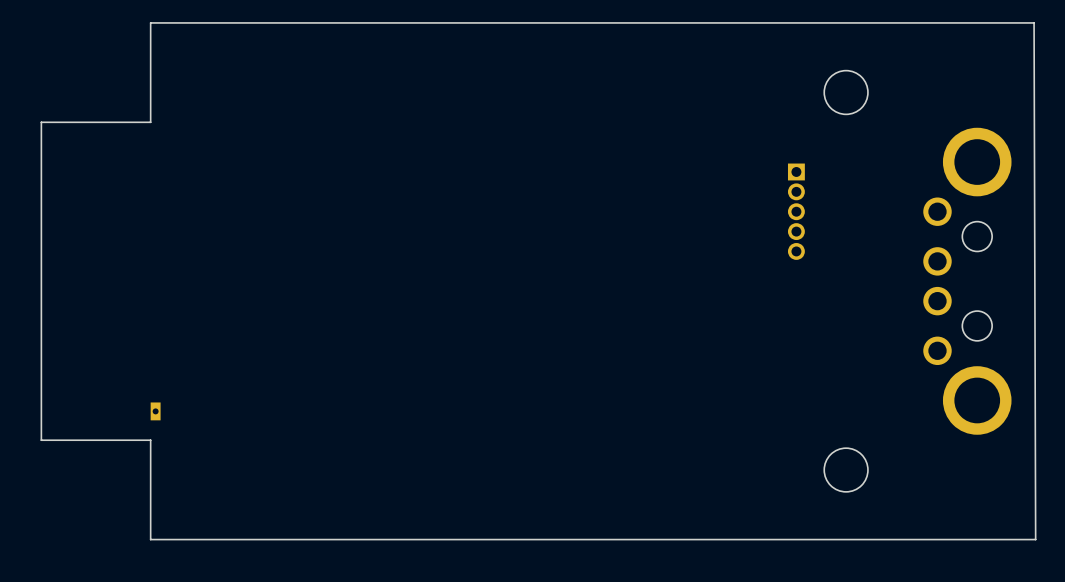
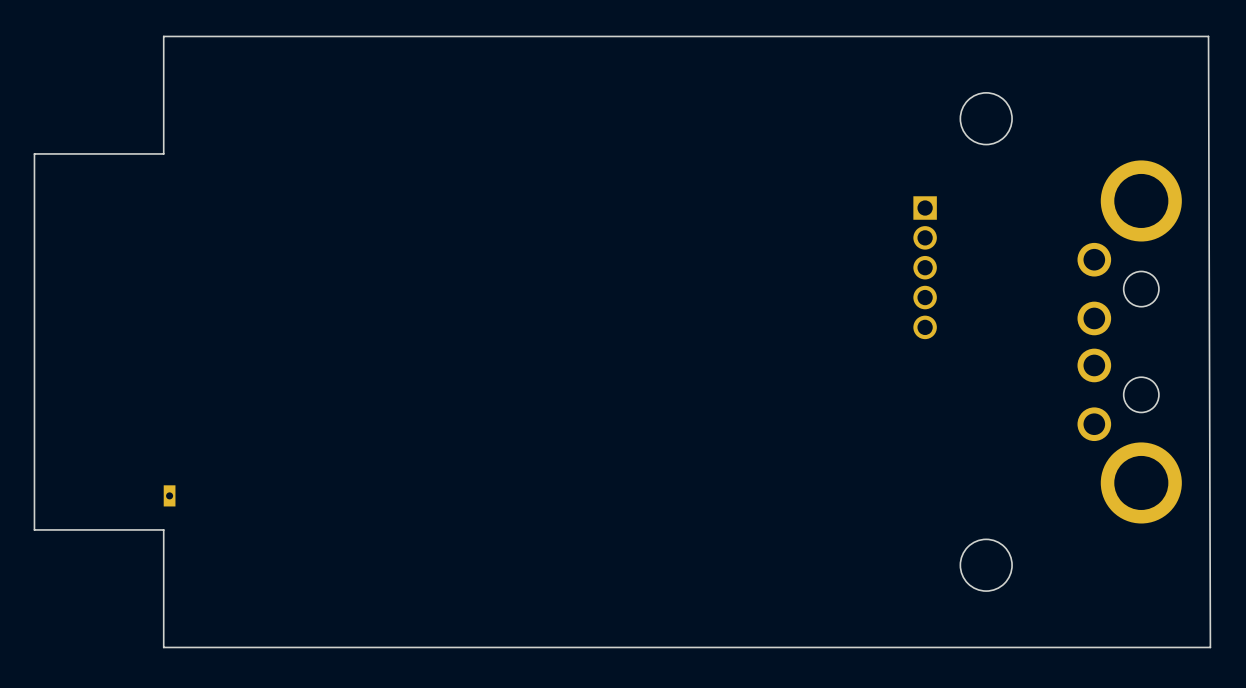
part footprint: [787, 163, 805, 260] -> [913, 196, 937, 340]

